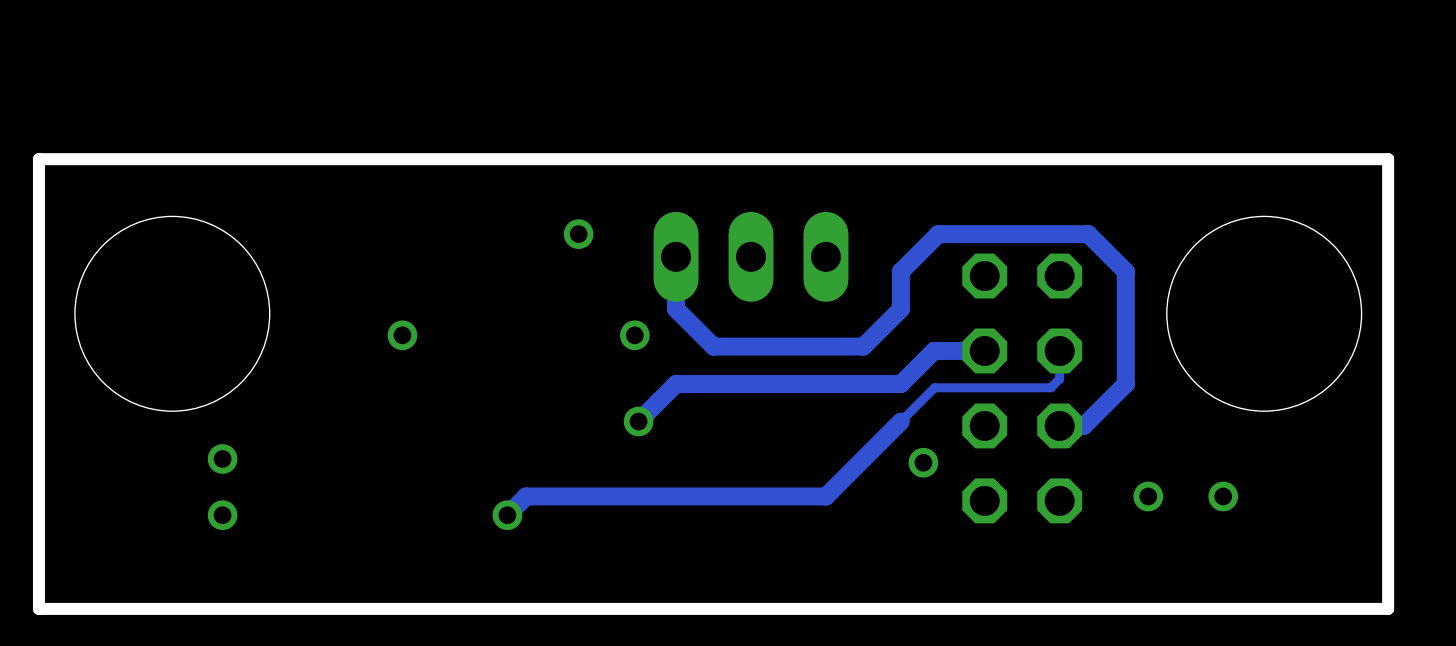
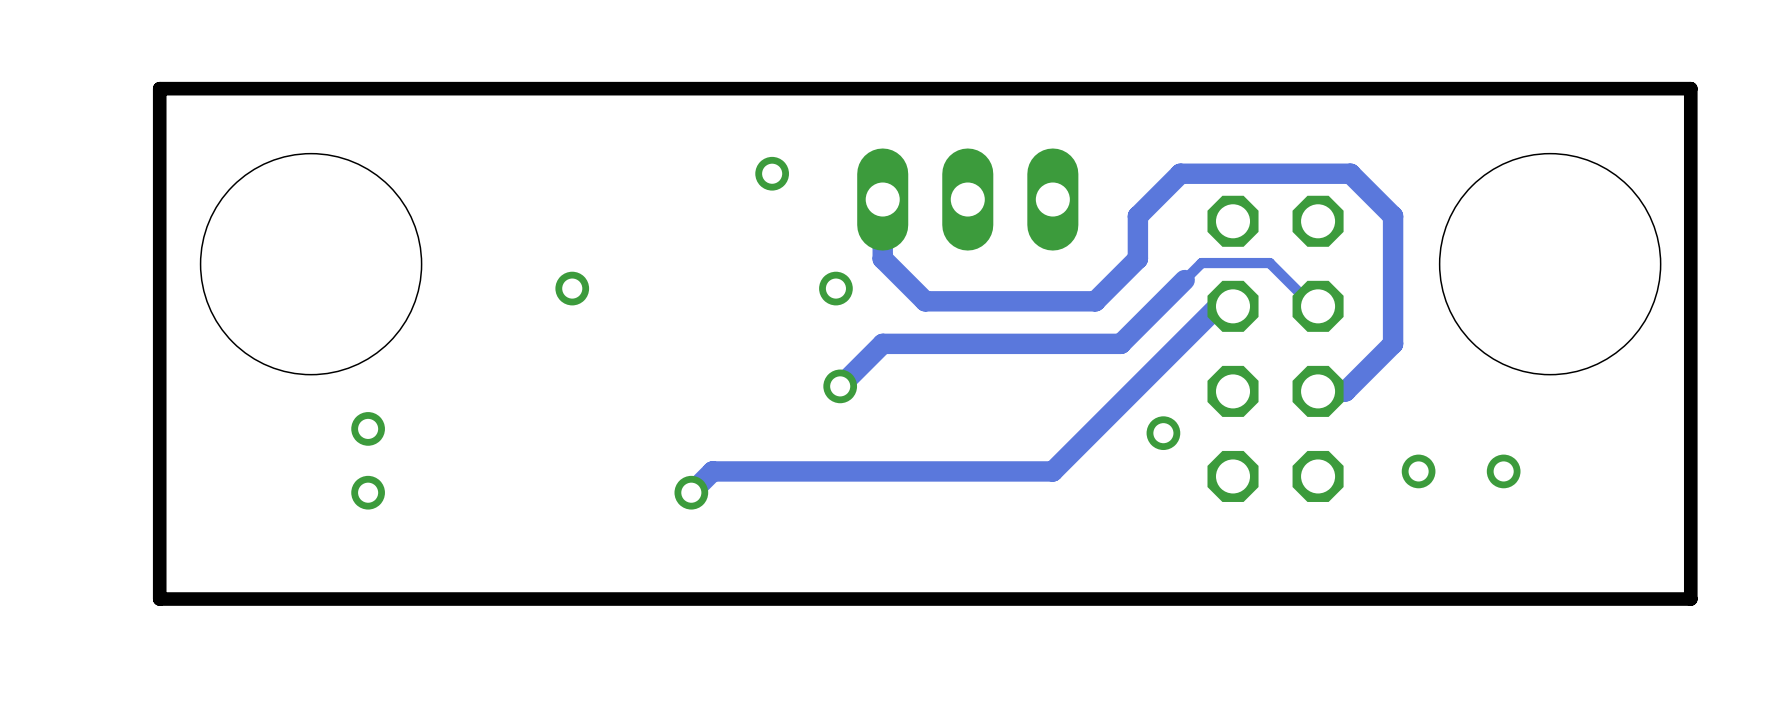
track: (971, 350) (933, 350) (900, 384) (885, 384) -> (1217, 306) (1176, 348)
track: (1059, 350) (1059, 378) (1050, 387) (934, 387) -> (1318, 306) (1313, 306) (1269, 263) (1201, 263) (1120, 343)
track width: thin (934, 387) (900, 421) -> thick (1176, 348) (1137, 386)

